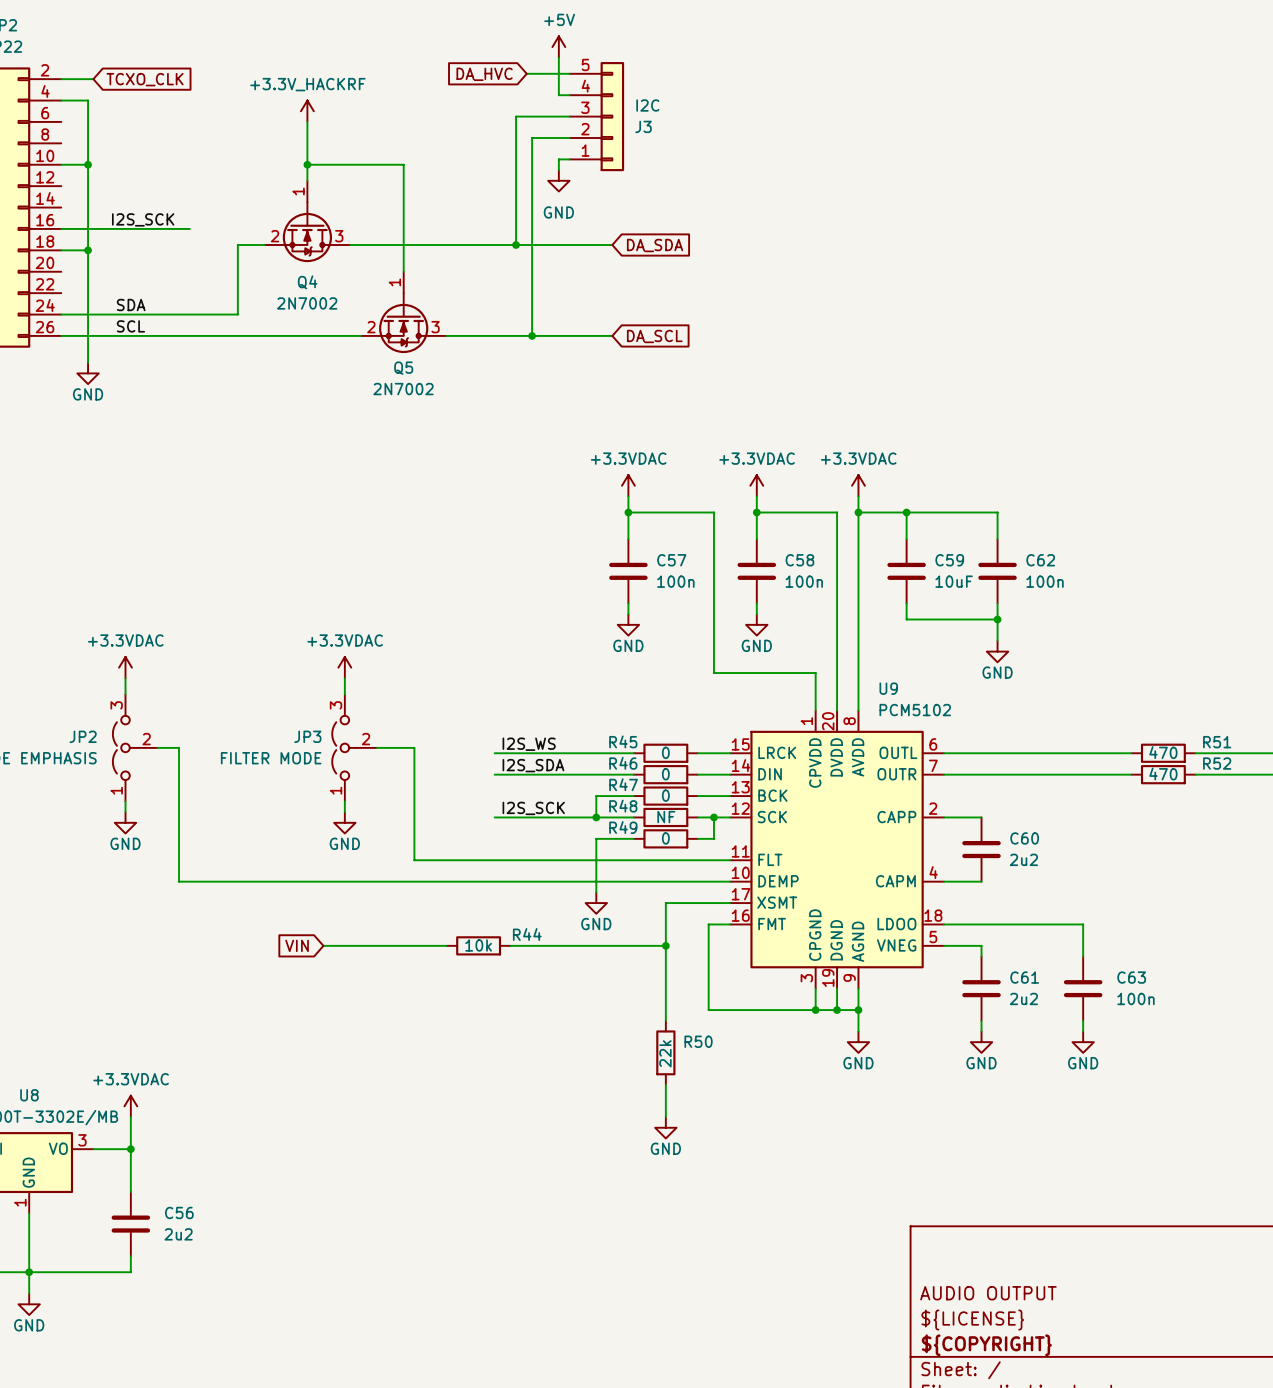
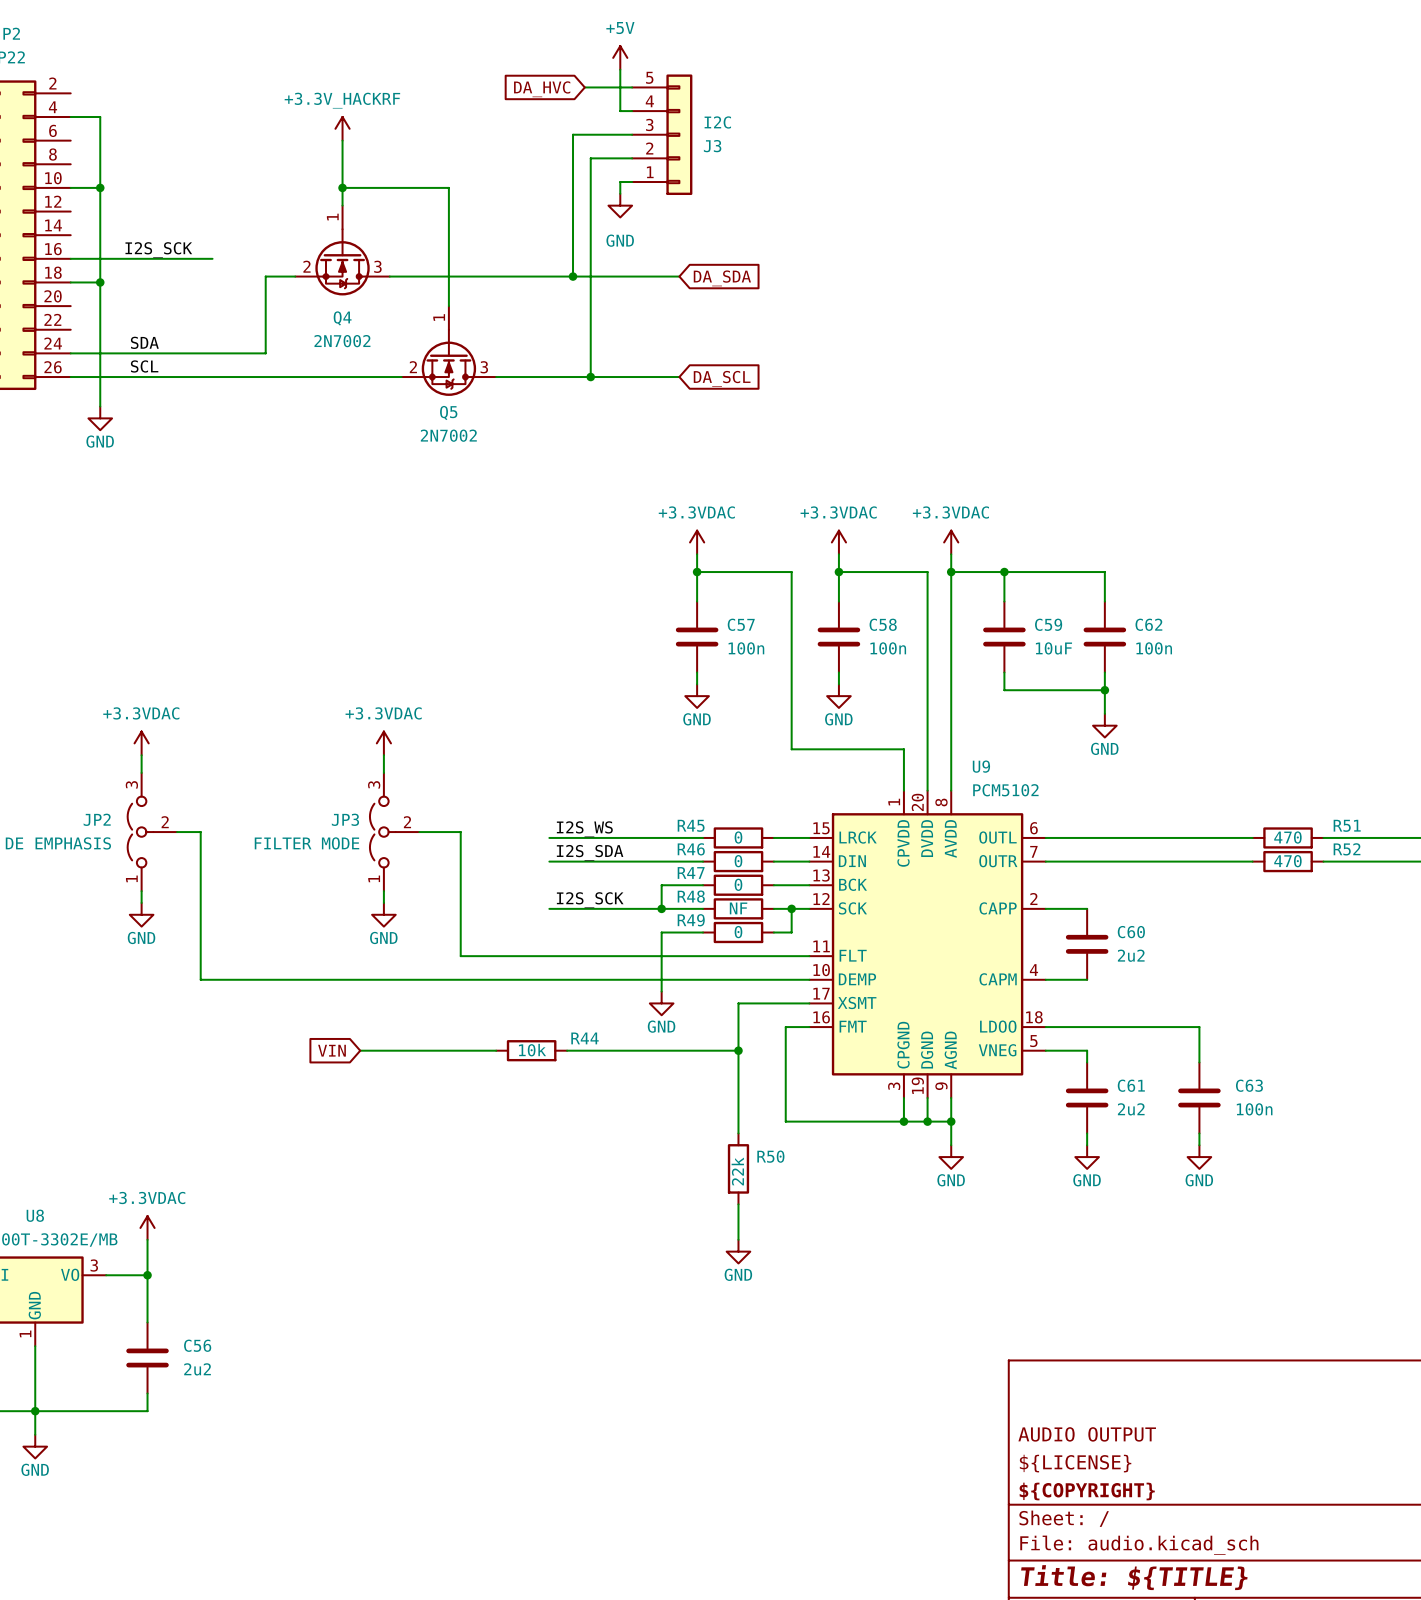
wire: (61, 79) (93, 79) -> none
global label: TCXO_CLK (145, 79) -> none

